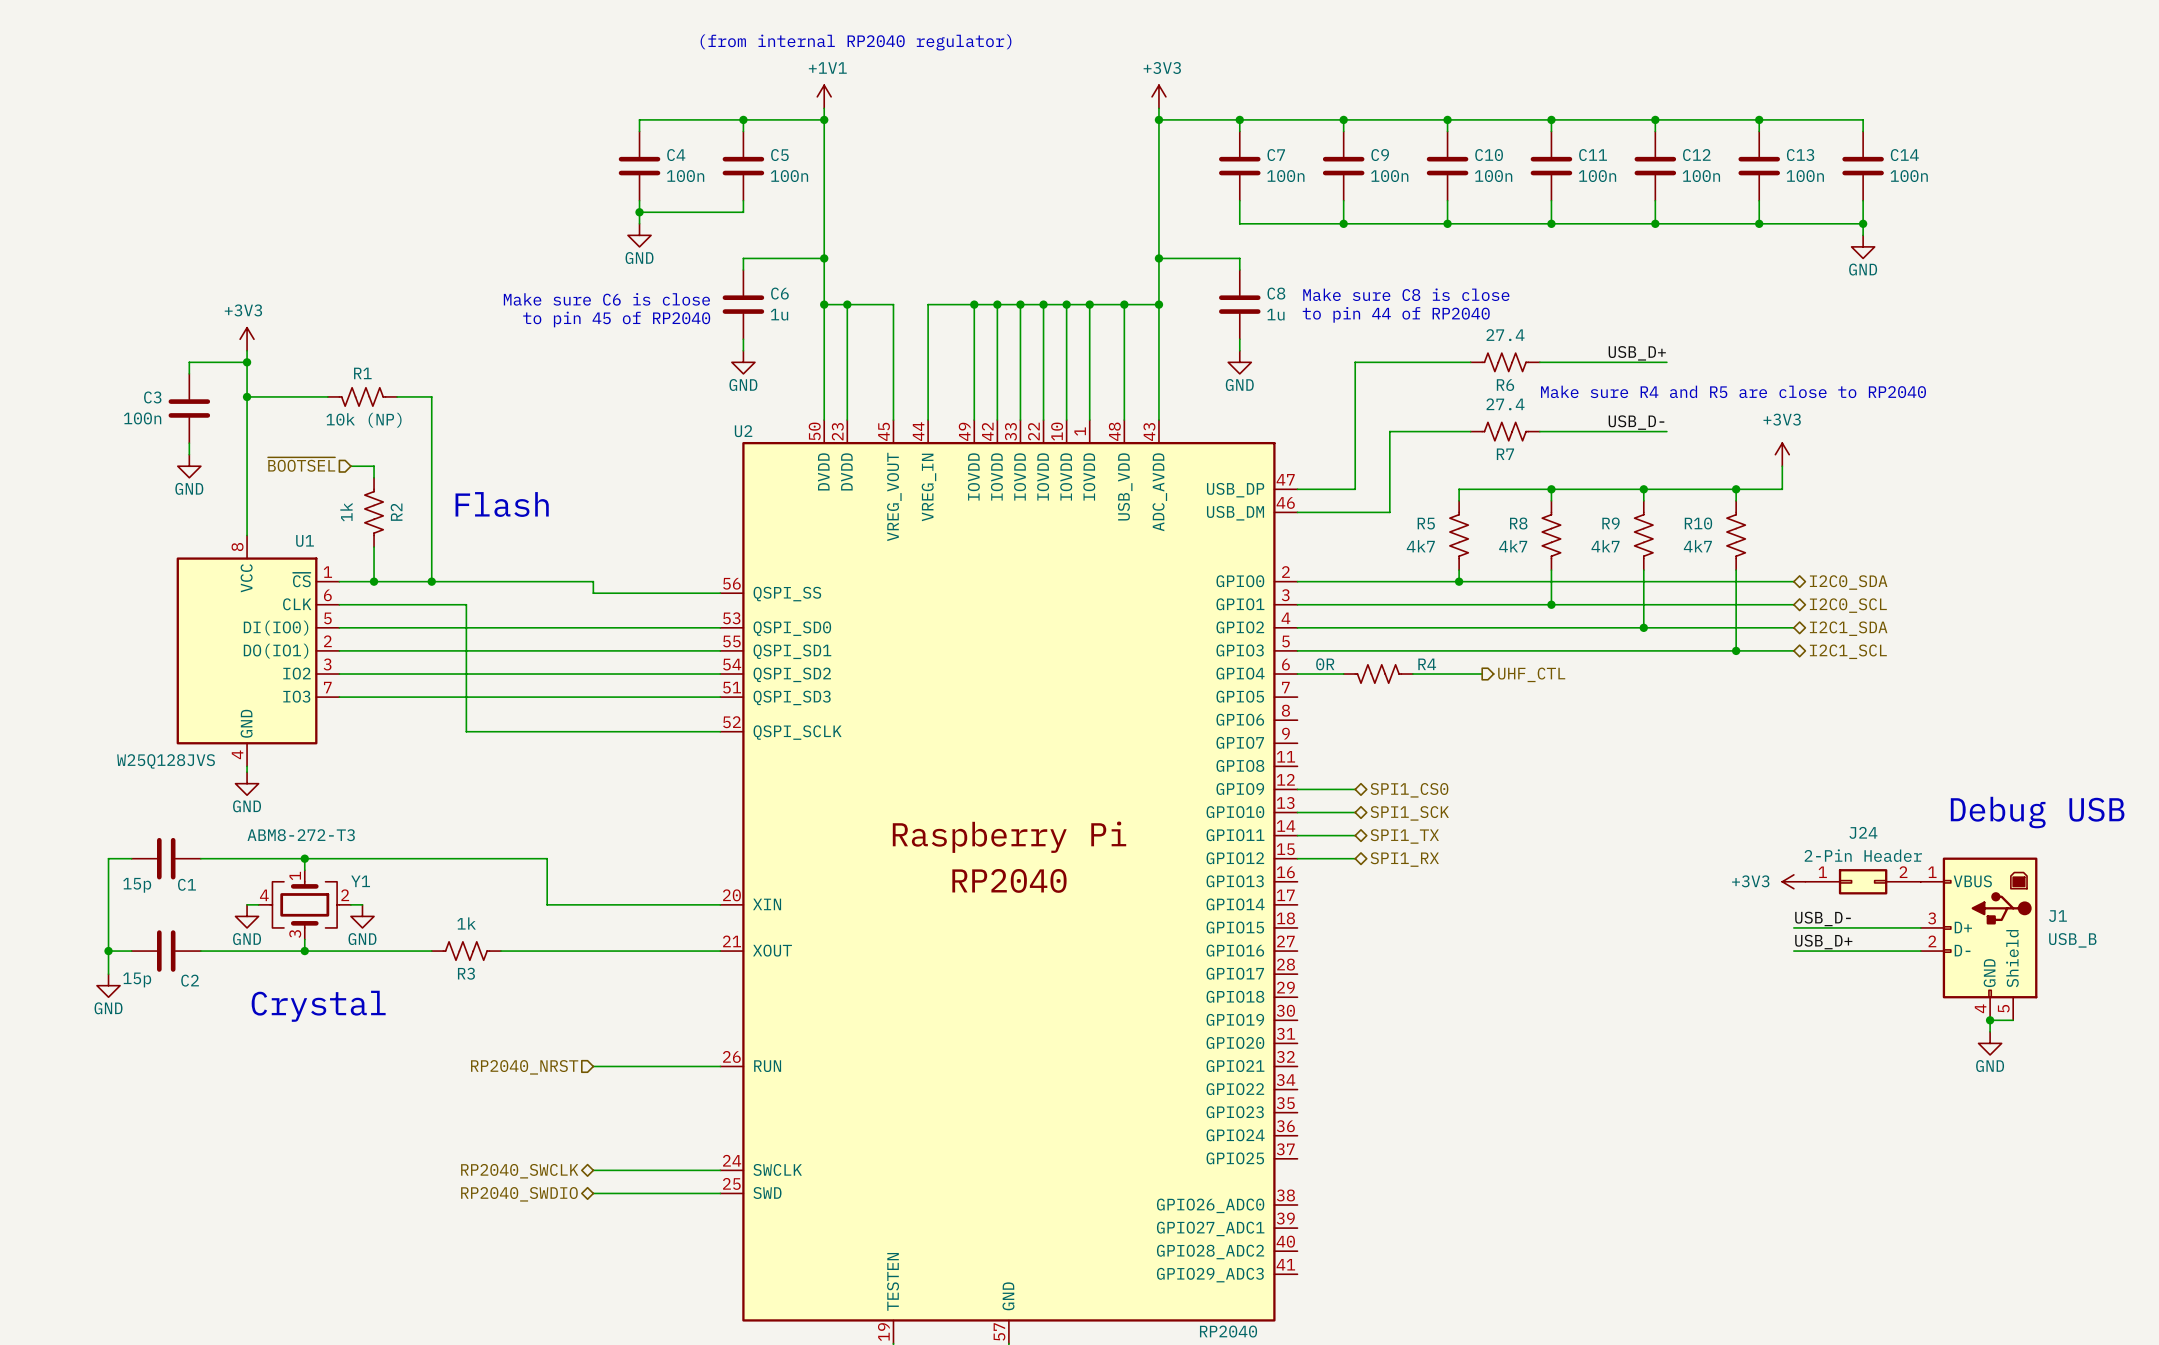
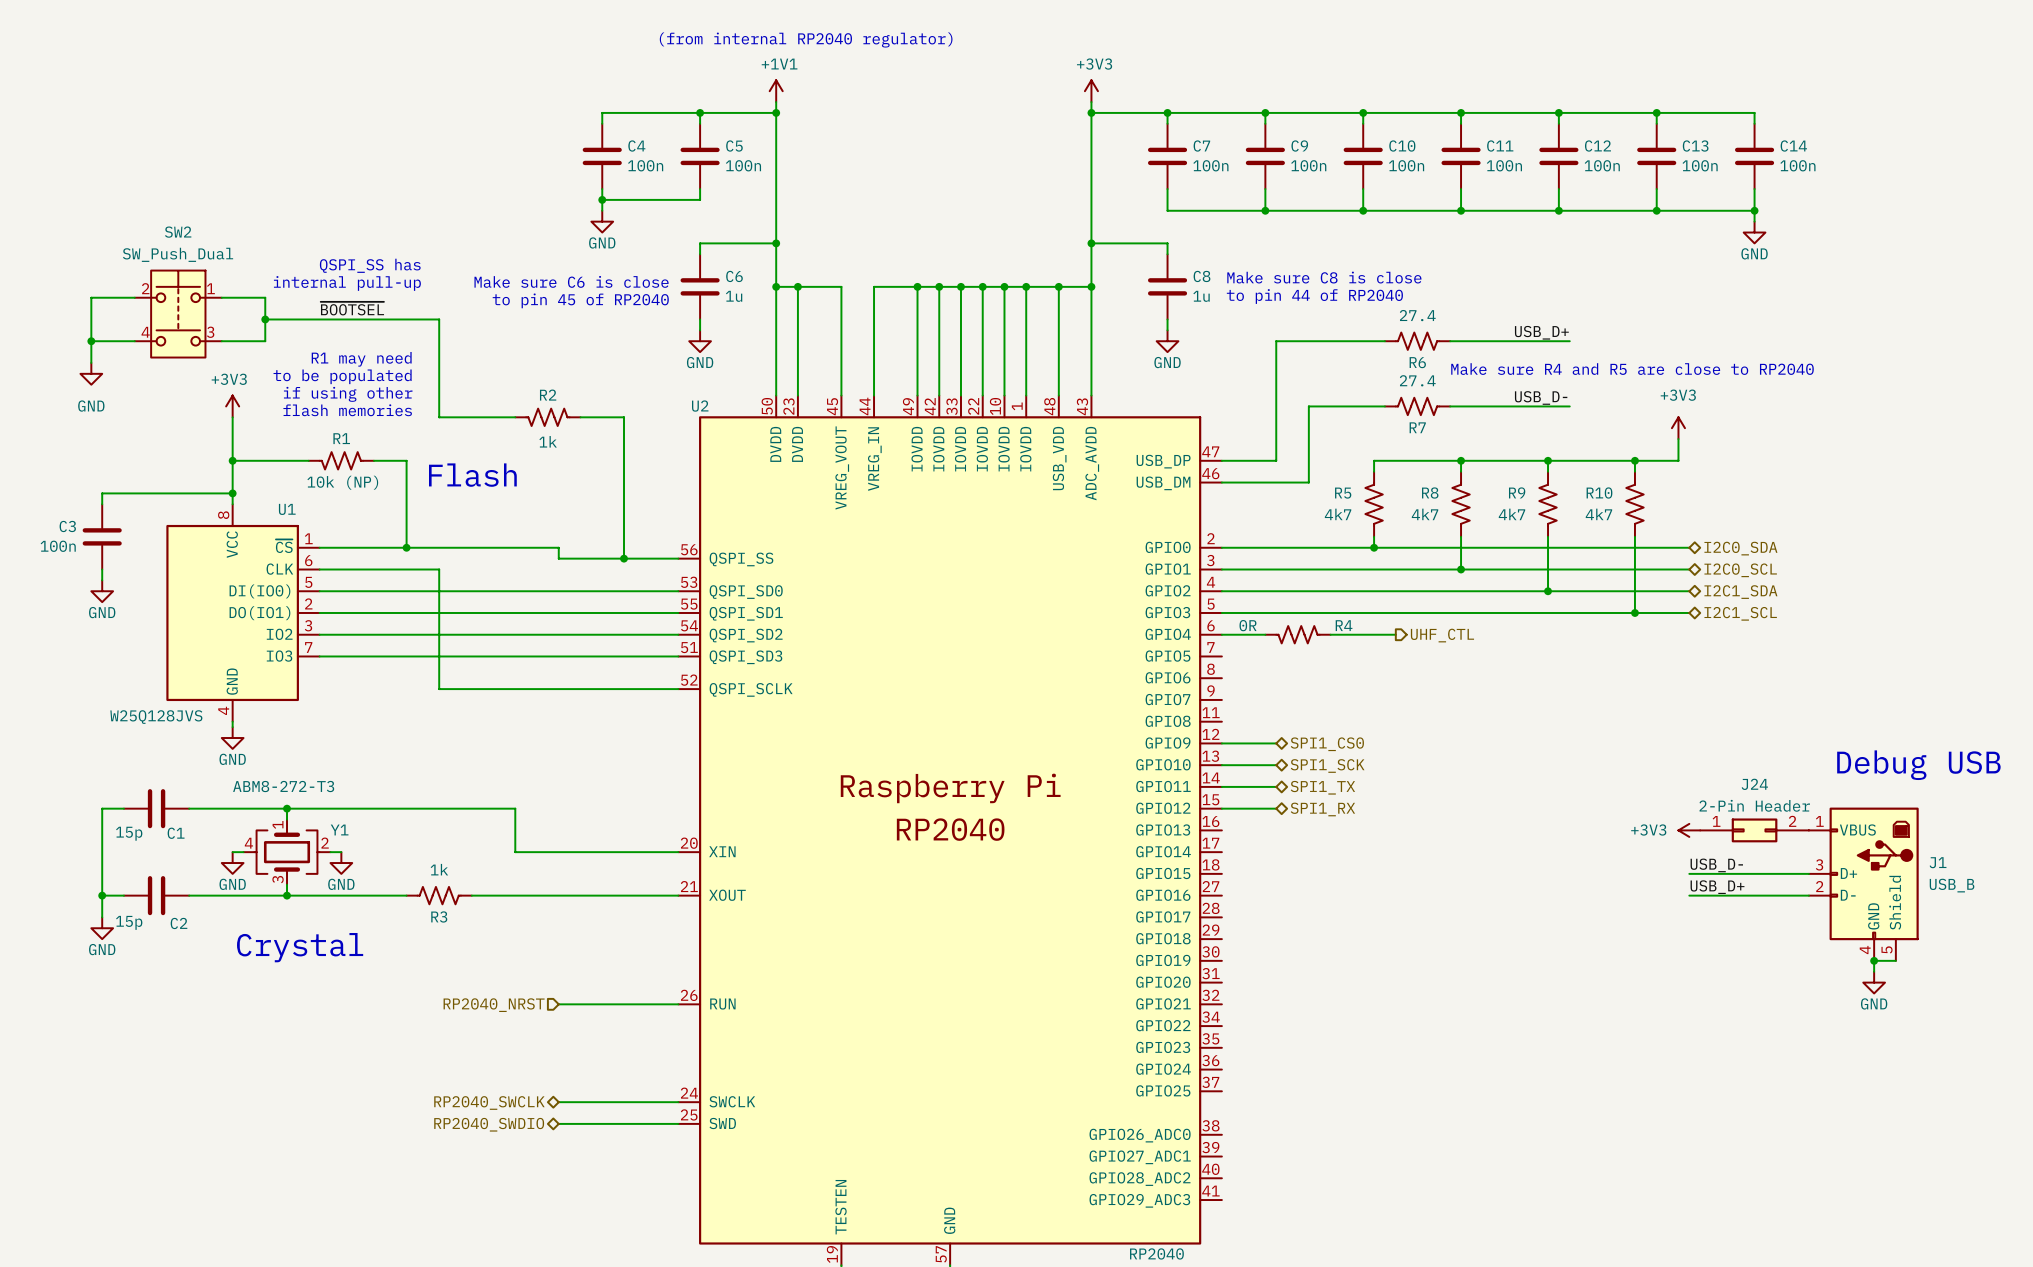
text: none -> QSPI_SS has (370, 265)
text: none -> internal pull-up (347, 283)
wire: none -> (134, 297) (91, 297) (91, 362)
wire: none -> (221, 297) (265, 297) (265, 341) (232, 341)
label: none -> ~{BOOTSEL} (352, 308)
SW2: none -> SW_Push_Dual (178, 314)
power symbol position: +3V3 (247, 339) -> +3V3 (232, 406)
wire: none -> (265, 319) (439, 319) (439, 417) (515, 417)
junction: none -> (265, 319)
wire: (247, 350) (247, 443) -> none
wire: none -> (91, 341) (134, 341)
junction: none -> (91, 341)
junction: (247, 362) -> none
text: none -> R1 may need (361, 359)
power symbol: none -> GND (91, 373)
wire: (247, 396) (327, 396) -> (232, 460) (308, 460)
junction: (247, 396) -> none
R1 position: (362, 396) -> (341, 460)
wire: (397, 396) (431, 396) (431, 489) -> (373, 460) (406, 460)
text: none -> to be populated (342, 376)
C3 position: (189, 408) -> (102, 536)
text: none -> if using other (348, 394)
text: none -> flash memories (347, 410)
wire: (189, 443) (189, 454) -> (102, 569) (102, 580)
wire: none -> (580, 417) (624, 417) (624, 558)
hierarchical label: ~{BOOTSEL} (301, 464) -> none
power symbol: GND (189, 466) -> none
wire: (350, 466) (374, 466) (374, 477) -> none
junction: none -> (232, 460)
R2 value position: 1k (346, 512) -> 1k (548, 441)
R2 rotation: 0° (374, 512) -> 90° clockwise (547, 417)
R2 position: (374, 512) -> (547, 417)
R2 name position: R2 (396, 512) -> R2 (548, 395)
wire: none -> (232, 493) (102, 493) (102, 504)
junction: none -> (232, 493)
wire: (374, 547) (374, 581) -> none
junction: (374, 581) -> none
junction: none -> (624, 558)
power symbol: none -> GND (102, 591)

